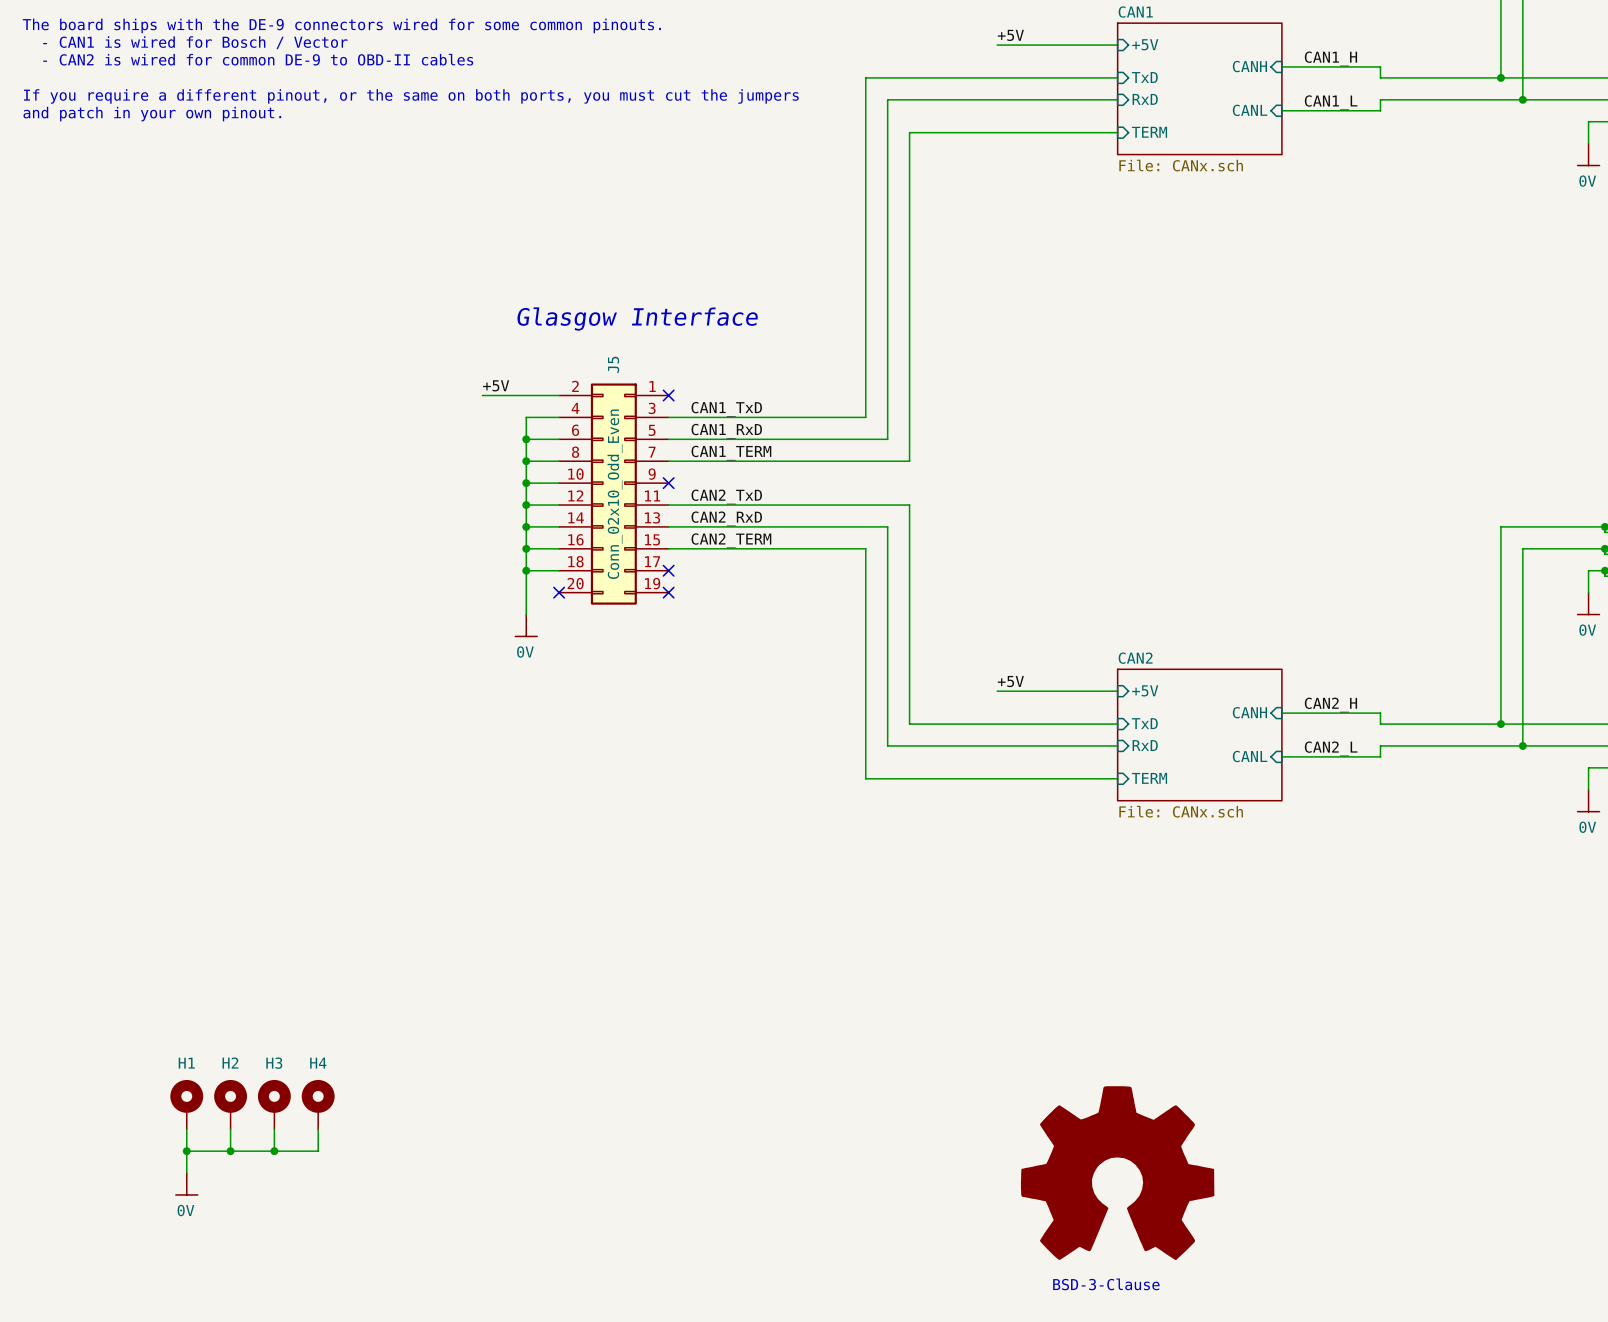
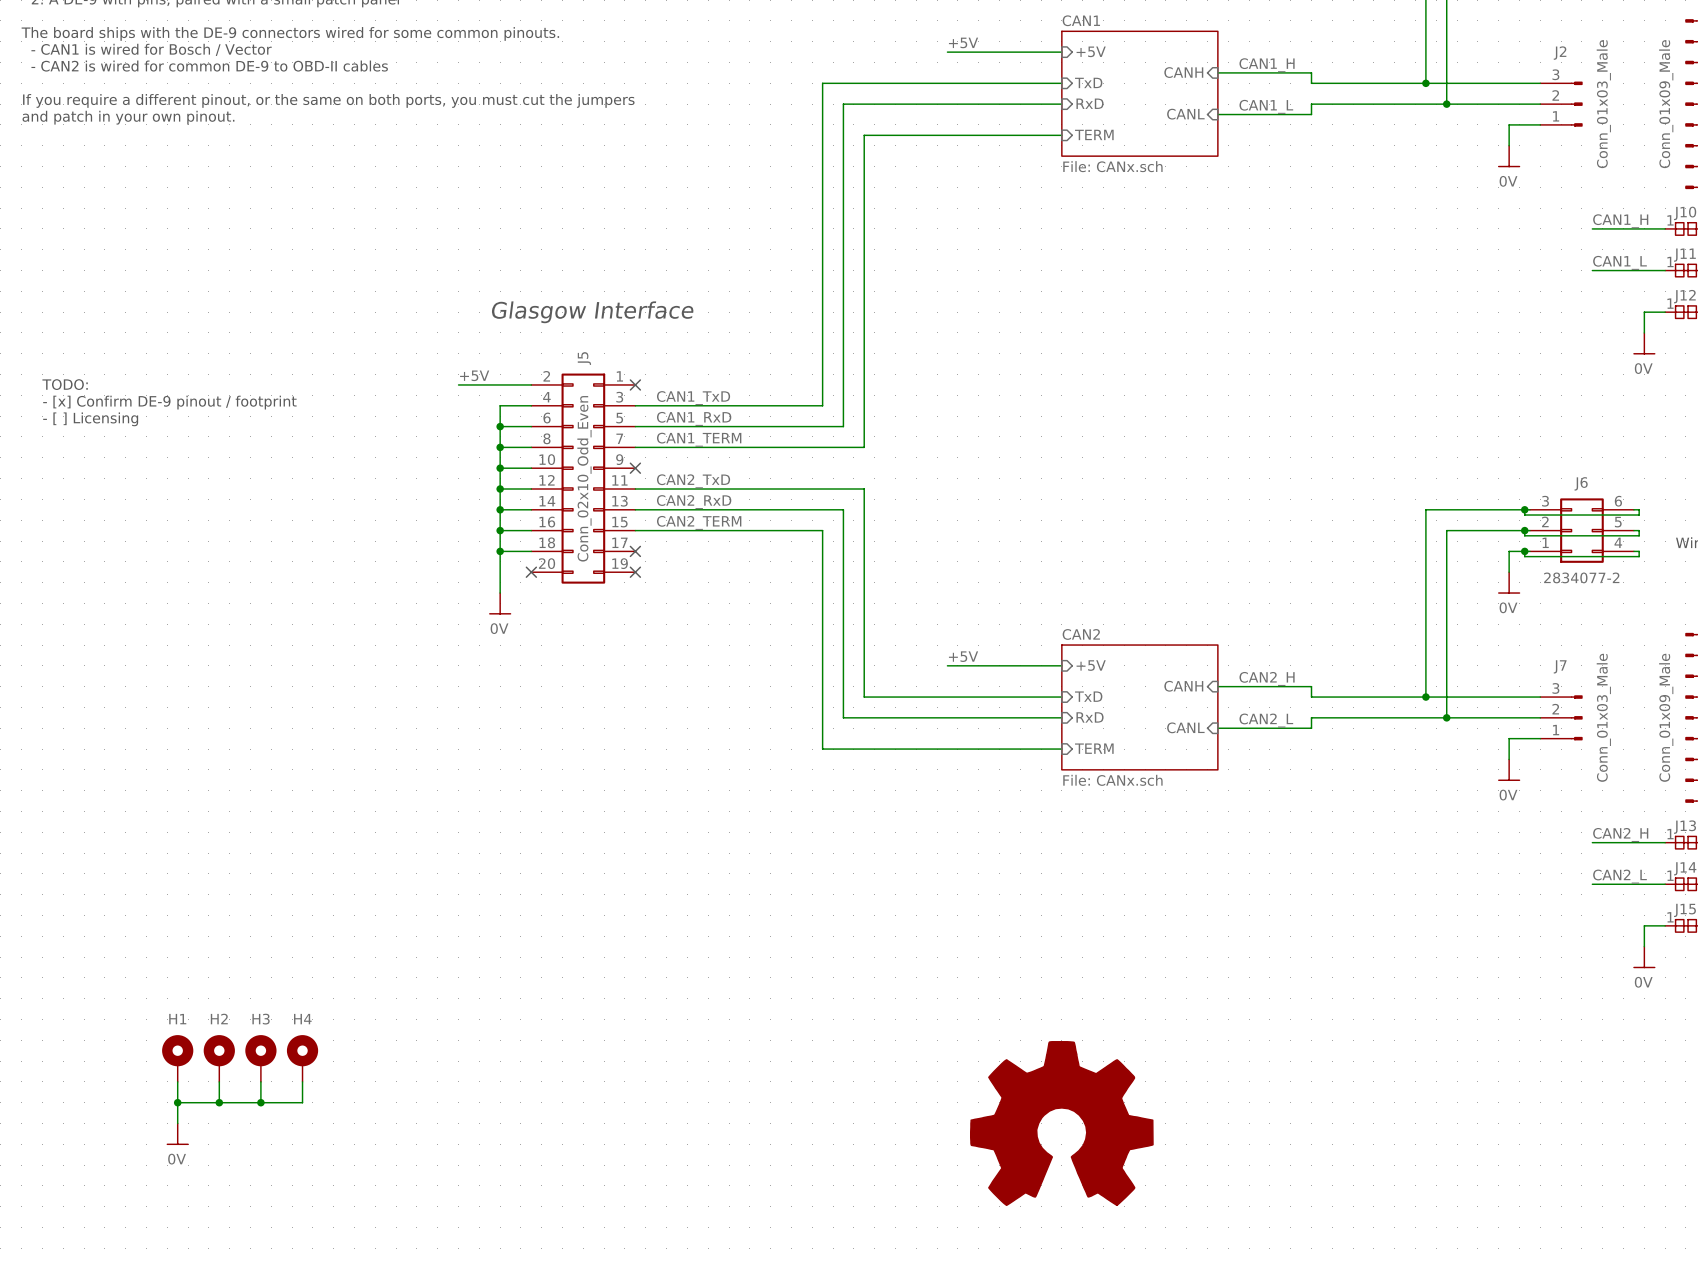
text: none -> TODO: (65, 384)
text: none -> - [x] Confirm DE-9 pinout / footprint (169, 402)
text: none -> - [ ] Licensing (90, 419)
text: BSD-3-Clause (1106, 1284) -> none

